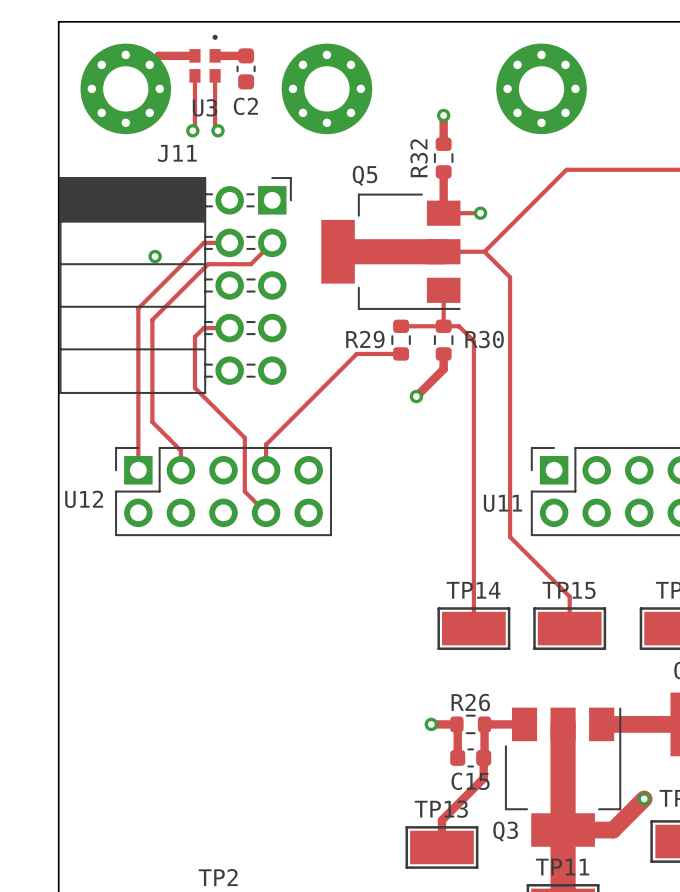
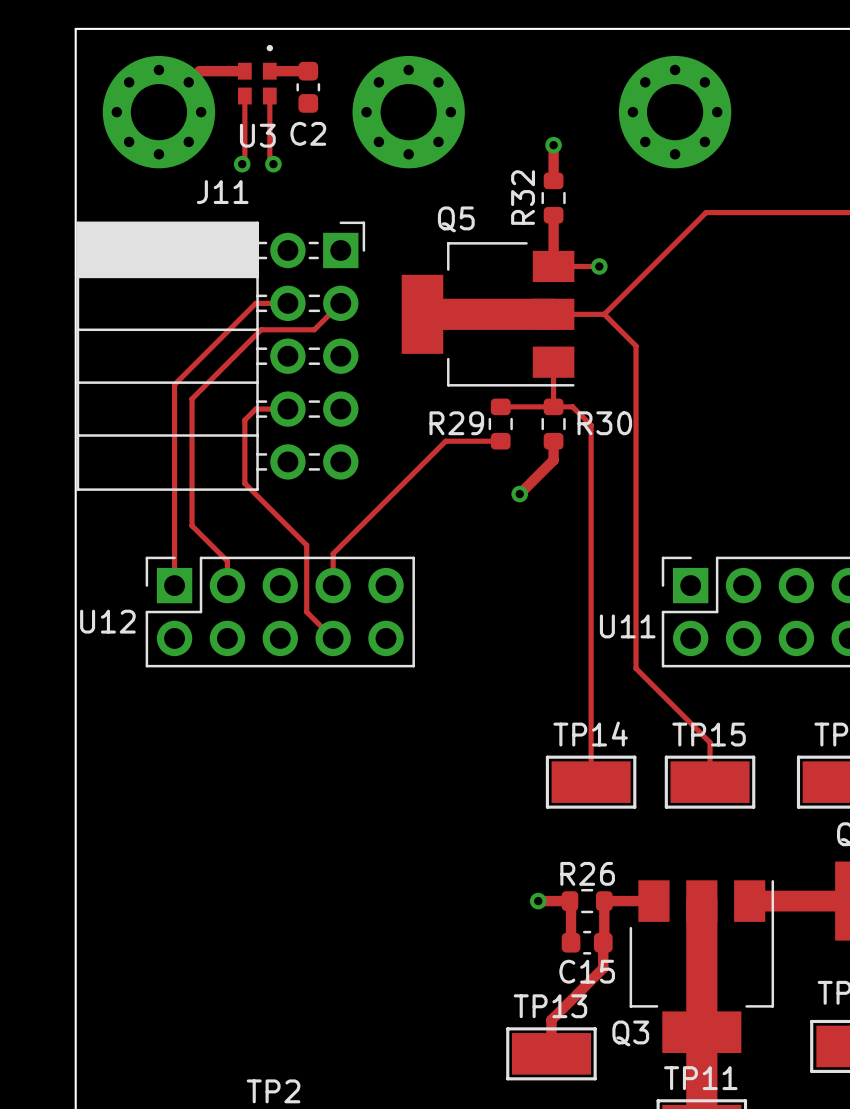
via: (155, 256) -> none
track: (644, 798) (613, 830) (563, 830) -> none
via: (644, 798) -> none

